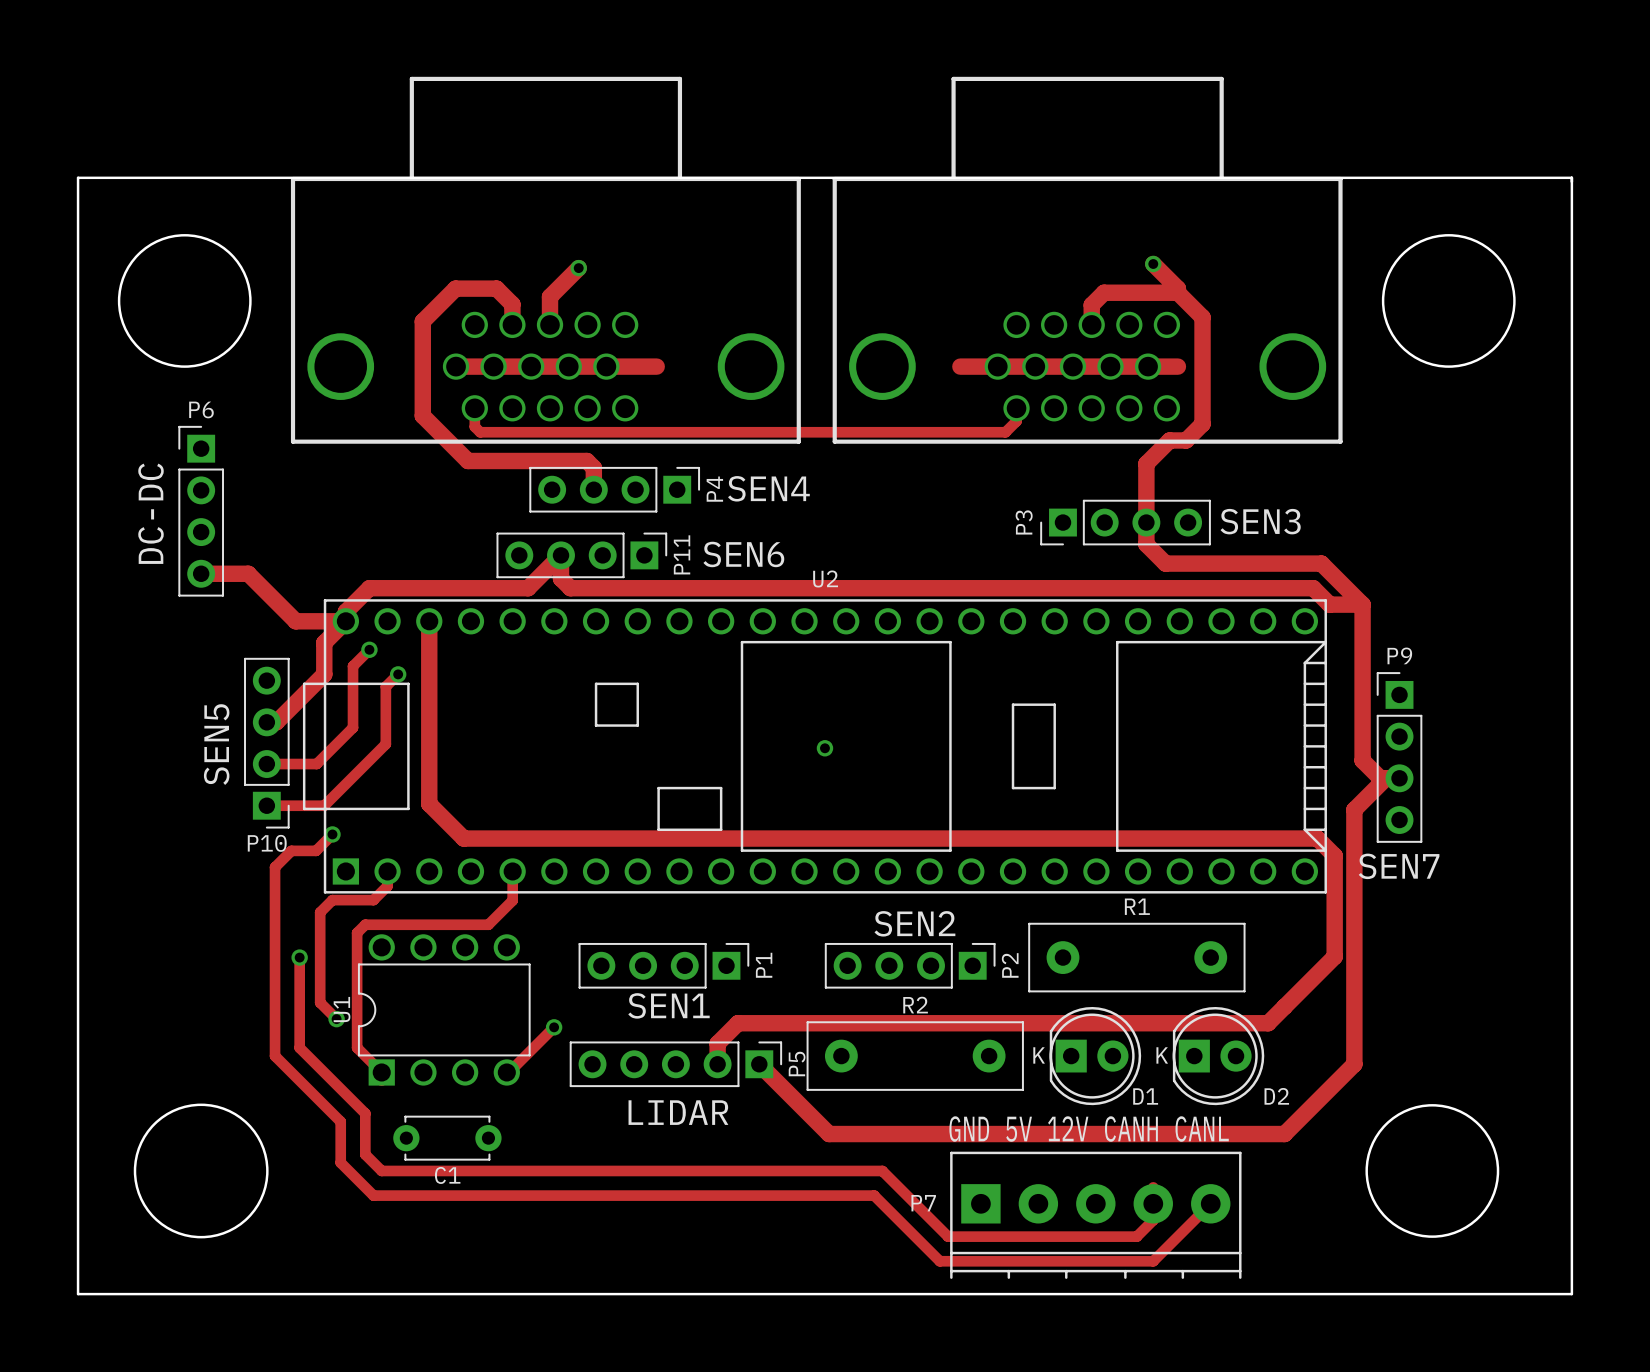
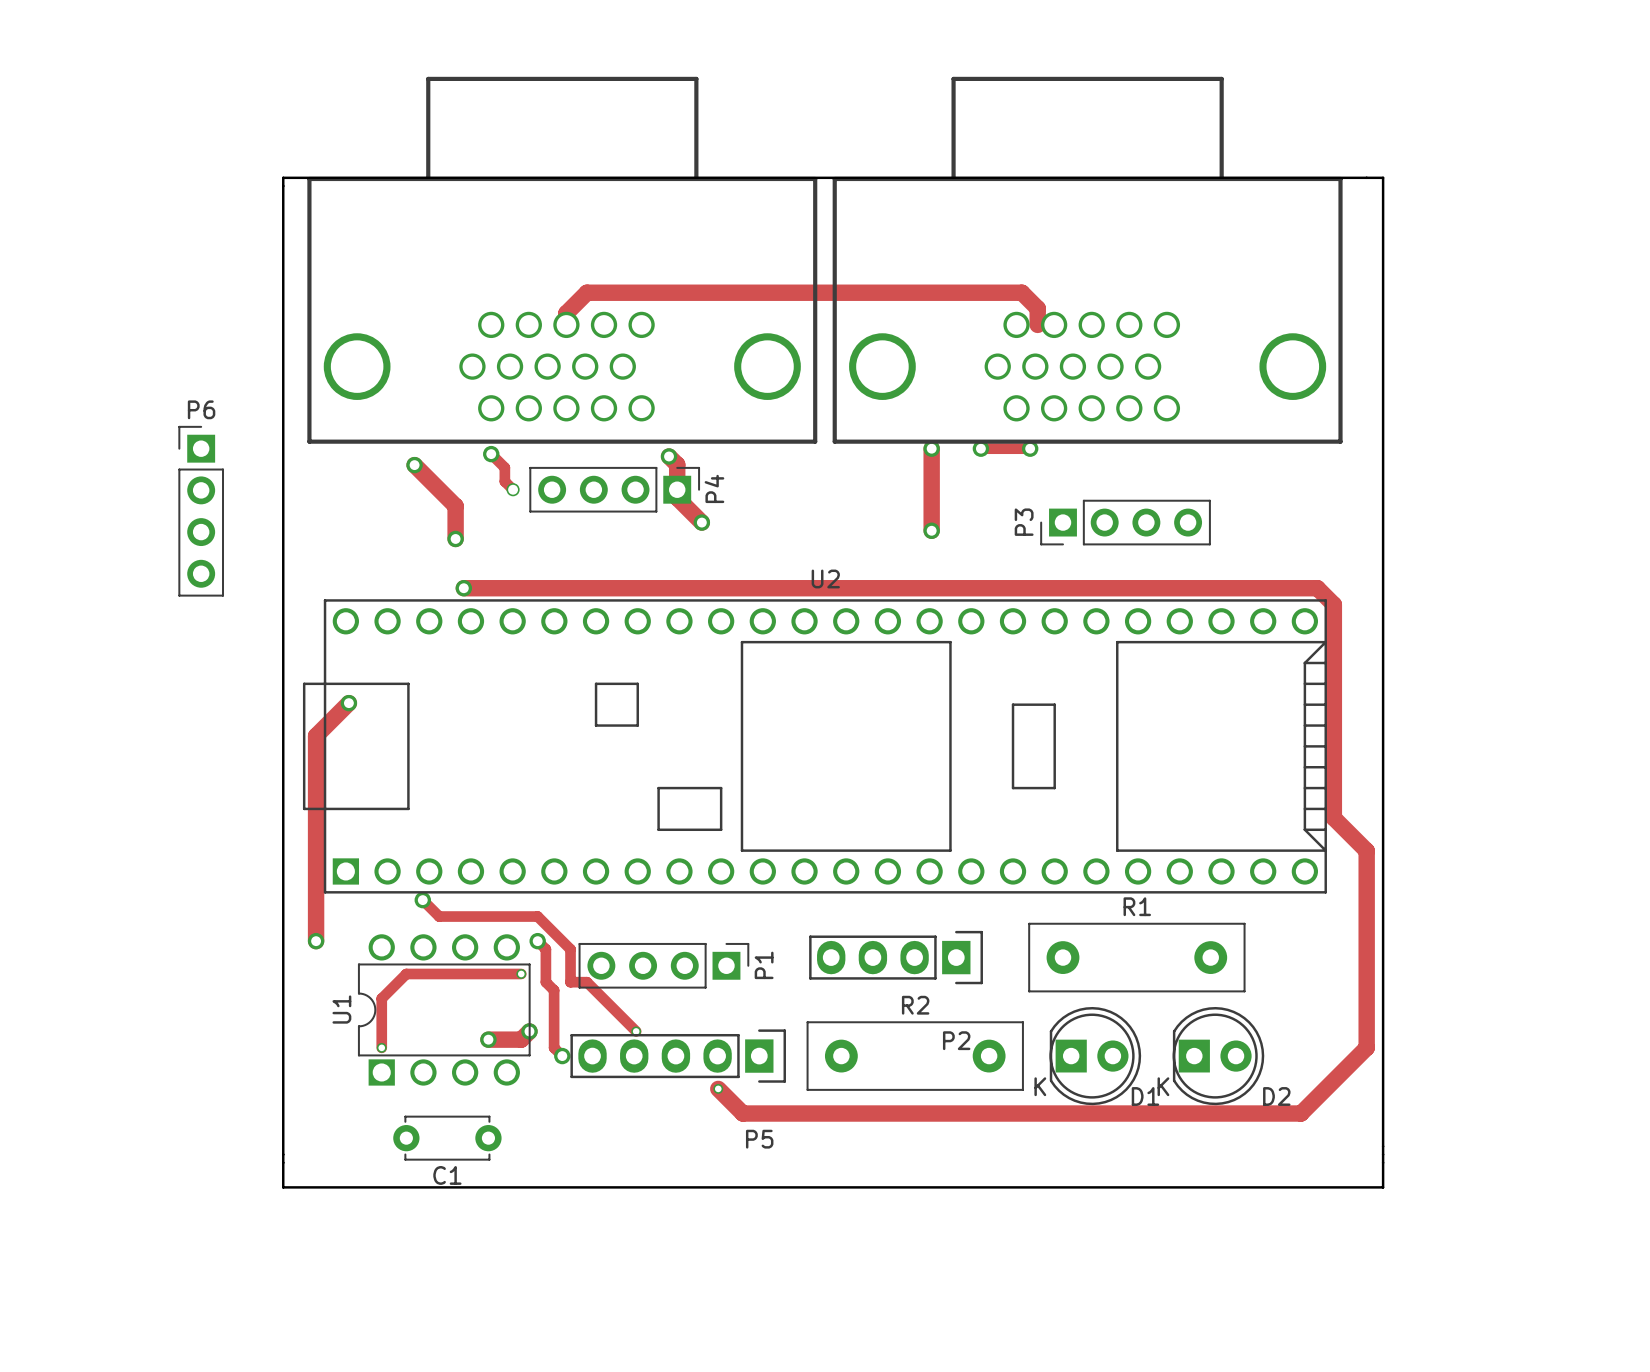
board edge: (283, 177) (78, 177) (78, 1294) (1571, 1294) (1571, 177) (1383, 177) -> (283, 177) (283, 1187) (1383, 1187) (1383, 177)
round board edge: [117, 234, 252, 368] -> none
round board edge: [1381, 234, 1516, 368] -> none
part position: (545, 260) -> (562, 260)
track: (1153, 264) (1177, 288) (1177, 292) -> none
via: (1153, 264) -> none
track: (578, 268) (550, 296) (550, 324) -> none
via: (578, 268) -> none
track: (1177, 292) (1202, 317) (1202, 424) (1186, 440) (1169, 440) (1146, 463) (1146, 544) (1165, 563) (1321, 563) (1362, 604) -> none
track: (1177, 292) (1104, 292) (1091, 305) (1091, 324) -> none
track: (512, 324) (512, 304) (496, 288) (455, 288) (422, 321) (422, 415) (467, 461) (586, 461) (593, 467) (593, 489) -> none
track: none -> (566, 324) (566, 313) (586, 292) (1021, 292) (1037, 308) (1037, 324)
track: (456, 366) (656, 366) -> none
track: (960, 366) (1177, 366) -> none
track: (474, 408) (474, 426) (480, 432) (1005, 432) (1016, 421) (1016, 408) -> none
track: none -> (931, 448) (931, 530)
via: none -> (931, 448)
track: none -> (980, 448) (1030, 448)
via: none -> (980, 448)
via: none -> (1030, 448)
track: none -> (491, 454) (504, 467) (504, 481) (513, 489)
via: none -> (491, 454)
track: none -> (669, 456) (677, 464) (677, 497) (701, 522)
via: none -> (669, 456)
track: none -> (414, 465) (455, 506) (455, 538)
via: none -> (414, 465)
text: SEN4 (768, 488) -> none
via: none -> (513, 489)
text: DC-DC (151, 513) -> none
text: SEN3 (1260, 521) -> none
via: none -> (701, 522)
via: none -> (931, 530)
via: none -> (455, 538)
text: SEN6 (743, 554) -> none
P11: (581, 555) -> none
track: (201, 573) (248, 573) (295, 621) (345, 621) -> none
track: (463, 588) (369, 588) (345, 611) (345, 621) -> none
via: none -> (463, 588)
track: (528, 588) (561, 555) (561, 578) (570, 588) -> (528, 588) (570, 588)
track: (1313, 588) (1329, 604) (1362, 604) -> (1313, 588) (1317, 588) (1333, 604) (1333, 818) (1366, 850) (1366, 1047) (1301, 1113) (742, 1113) (718, 1088)
track: (1362, 604) (1362, 760) (1380, 778) (1399, 778) -> none
track: (345, 621) (324, 642) (324, 674) (276, 722) (266, 722) -> none
track: (429, 621) (429, 804) (463, 838) (1317, 838) (1334, 855) (1334, 956) (1268, 1023) (737, 1023) (717, 1043) (717, 1064) -> none
track: (369, 649) (353, 666) (353, 727) (316, 764) (266, 764) -> none
via: (369, 649) -> none
track: (398, 674) (385, 686) (385, 744) (324, 805) (266, 805) -> none
via: (398, 674) -> none
track: none -> (348, 703) (316, 735) (316, 941)
via: none -> (348, 703)
P10: (266, 743) -> none
text: SEN5 (216, 744) -> none
via: (824, 748) -> none
P9: (1399, 757) -> none
track: (1385, 778) (1354, 809) (1354, 1064) (1284, 1134) (829, 1134) (759, 1064) -> none
track: (332, 834) (316, 850) (291, 850) (275, 867) (275, 1056) (340, 1121) (340, 1162) (373, 1195) (874, 1195) (939, 1261) (1153, 1261) (1210, 1203) -> none
via: (332, 834) -> none
text: SEN7 (1399, 866) -> none
track: (387, 871) (387, 886) (373, 900) (332, 900) (320, 912) (320, 1002) (336, 1019) -> none
track: (512, 871) (512, 900) (488, 924) (365, 924) (357, 932) (357, 1047) (381, 1072) (381, 1080) -> none
track: none -> (422, 900) (439, 916) (537, 916) (570, 949) (570, 982) (586, 982) (636, 1031)
via: none -> (422, 900)
text: SEN2 (914, 923) -> none
track: none -> (537, 941) (545, 949) (545, 982) (554, 990) (554, 1047) (562, 1056)
via: none -> (537, 941)
P2 footprint: [824, 942, 996, 989] -> [809, 930, 983, 985]
track: (299, 957) (299, 1047) (365, 1113) (365, 1154) (381, 1170) (882, 1170) (948, 1236) (1136, 1236) (1153, 1220) (1153, 1187) -> none
via position: (299, 957) -> (316, 941)
P2 name position: P2 (1010, 965) -> P2 (956, 1040)
track: none -> (521, 973) (406, 973) (381, 998) (381, 1047)
via: none -> (521, 973)
text: SEN1 (668, 1005) -> none
via: (336, 1019) -> none
track: (554, 1027) (506, 1072) -> none
via: (554, 1027) -> none
track: none -> (529, 1031) (521, 1039) (488, 1039)
via: none -> (529, 1031)
via: none -> (636, 1031)
via: none -> (488, 1039)
P5 footprint: [569, 1041, 783, 1088] -> [570, 1029, 786, 1083]
via: none -> (381, 1047)
D1 text position: K (1039, 1055) -> K (1040, 1086)
D2 text position: K (1162, 1055) -> K (1163, 1086)
via: none -> (562, 1056)
P5 name position: P5 (797, 1064) -> P5 (759, 1139)
via: none -> (718, 1088)
round board edge: [133, 1103, 269, 1239] -> none
round board edge: [1365, 1104, 1500, 1238] -> none
text: LIDAR (678, 1112) -> none
text: GND 5V 12V CANH CANL (1089, 1129) -> none
P7: (1095, 1215) -> none

